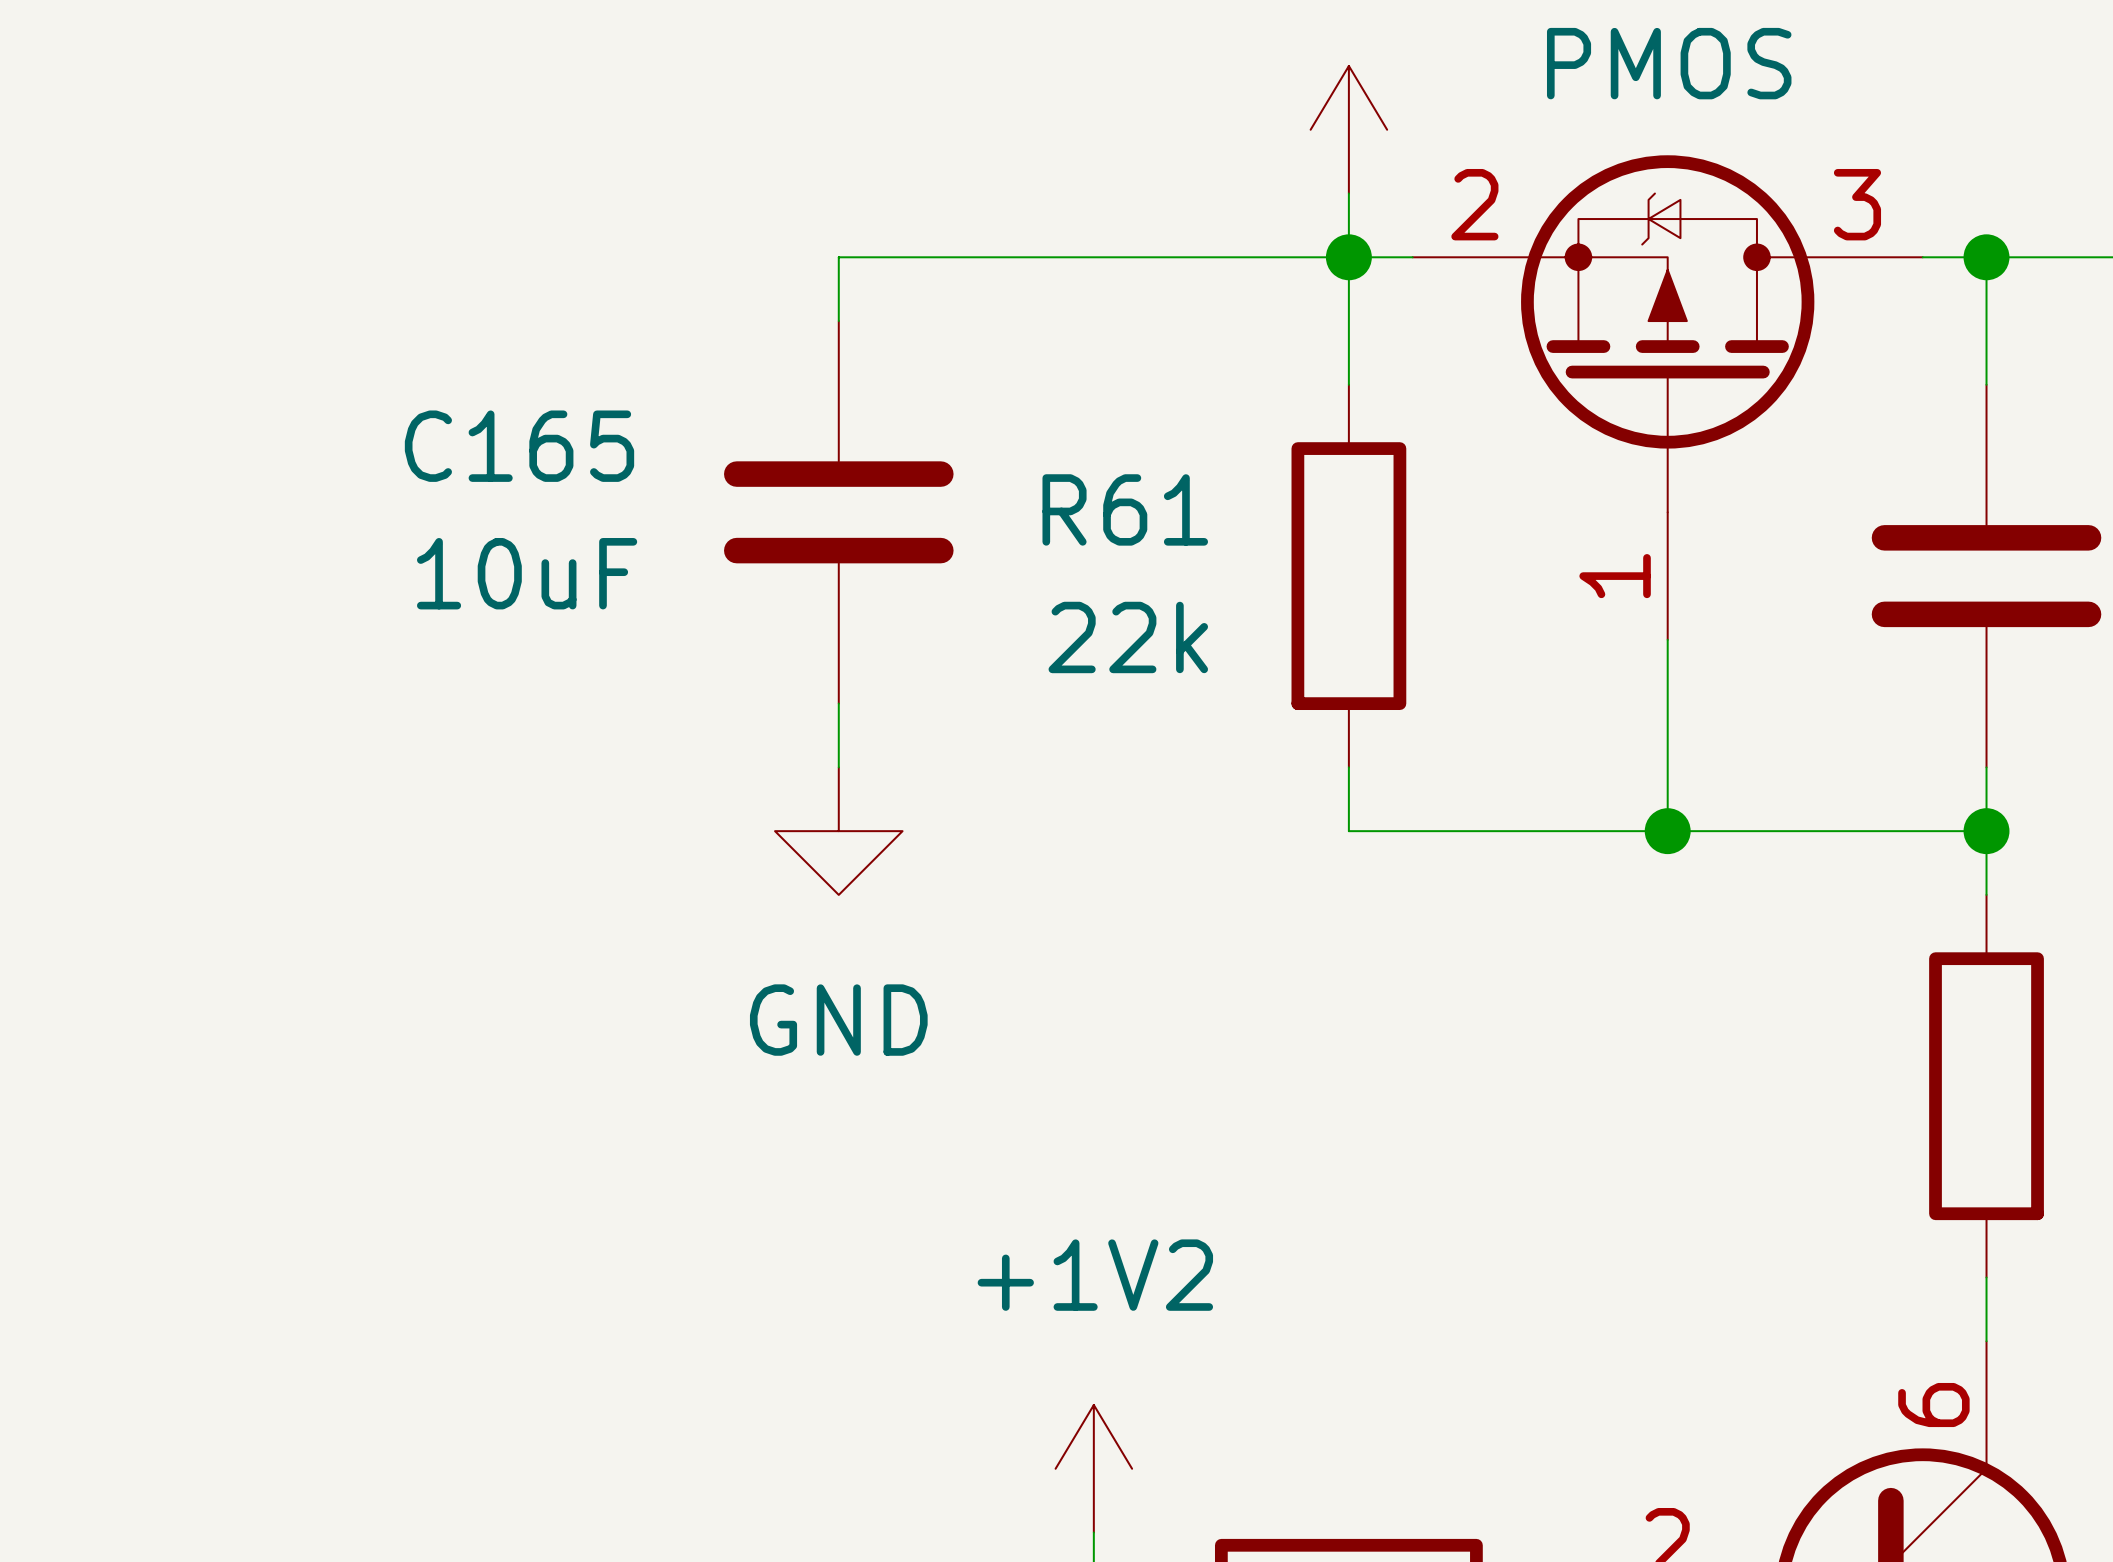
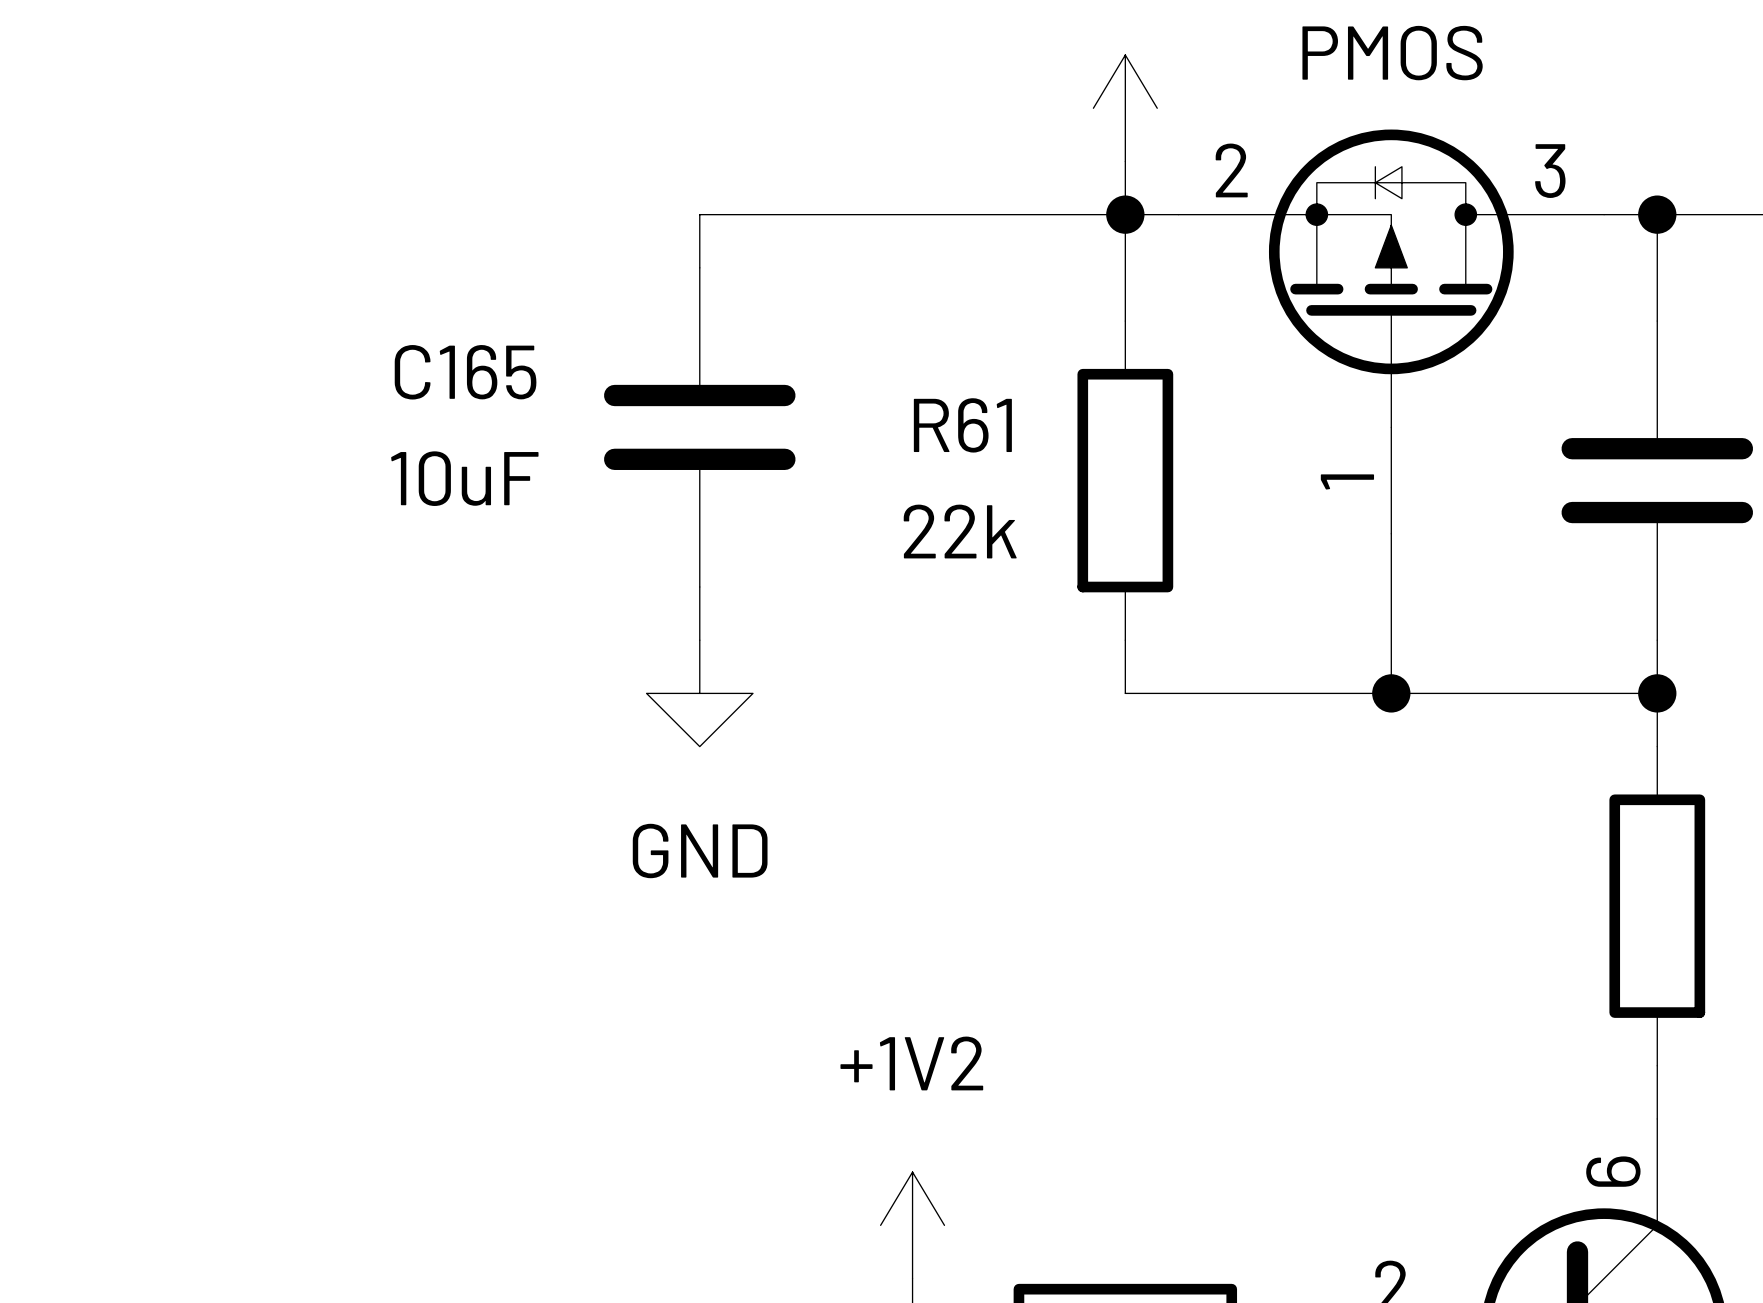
part symbol: [1412, 155, 1923, 640] -> [1178, 129, 1605, 534]

